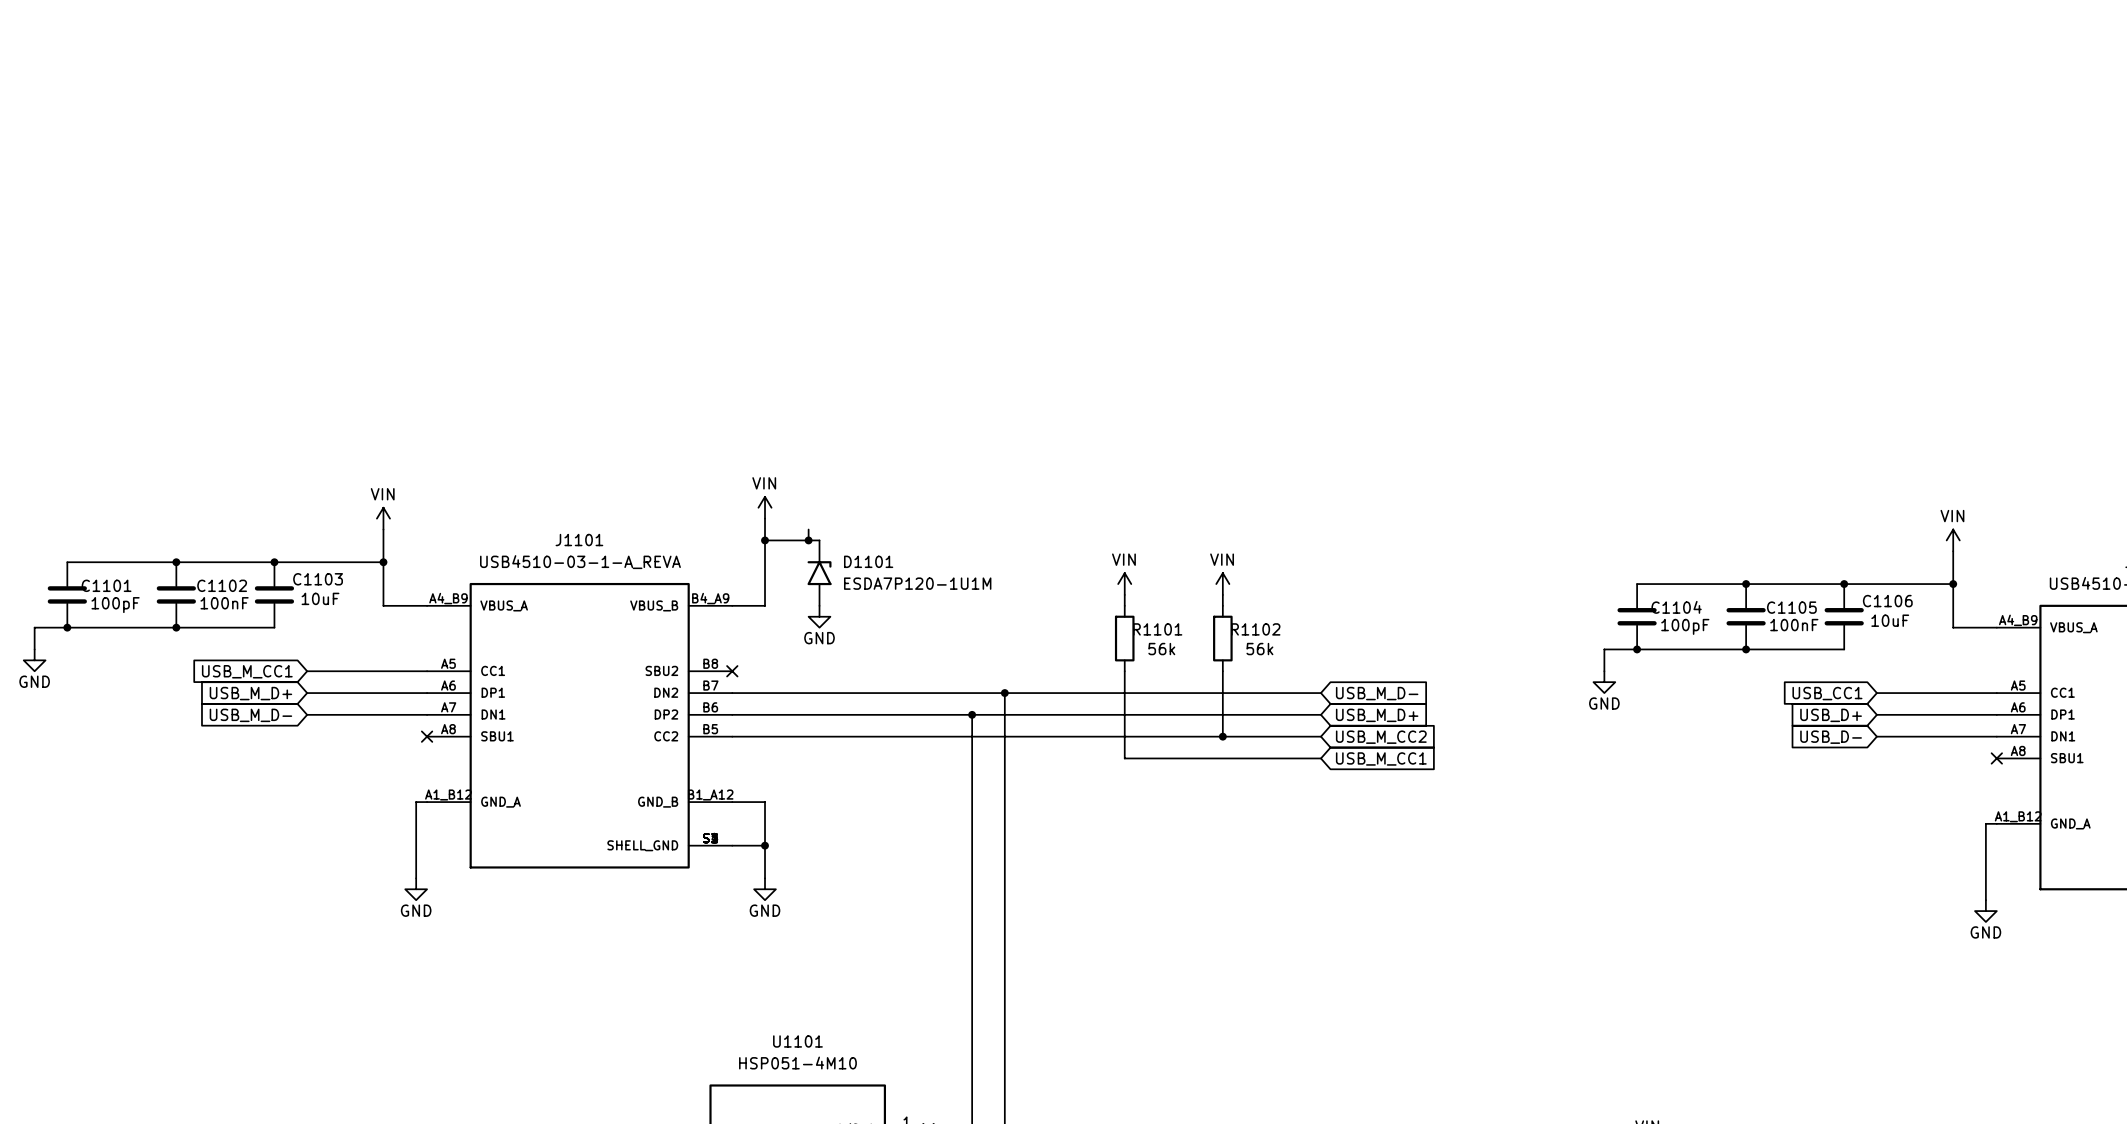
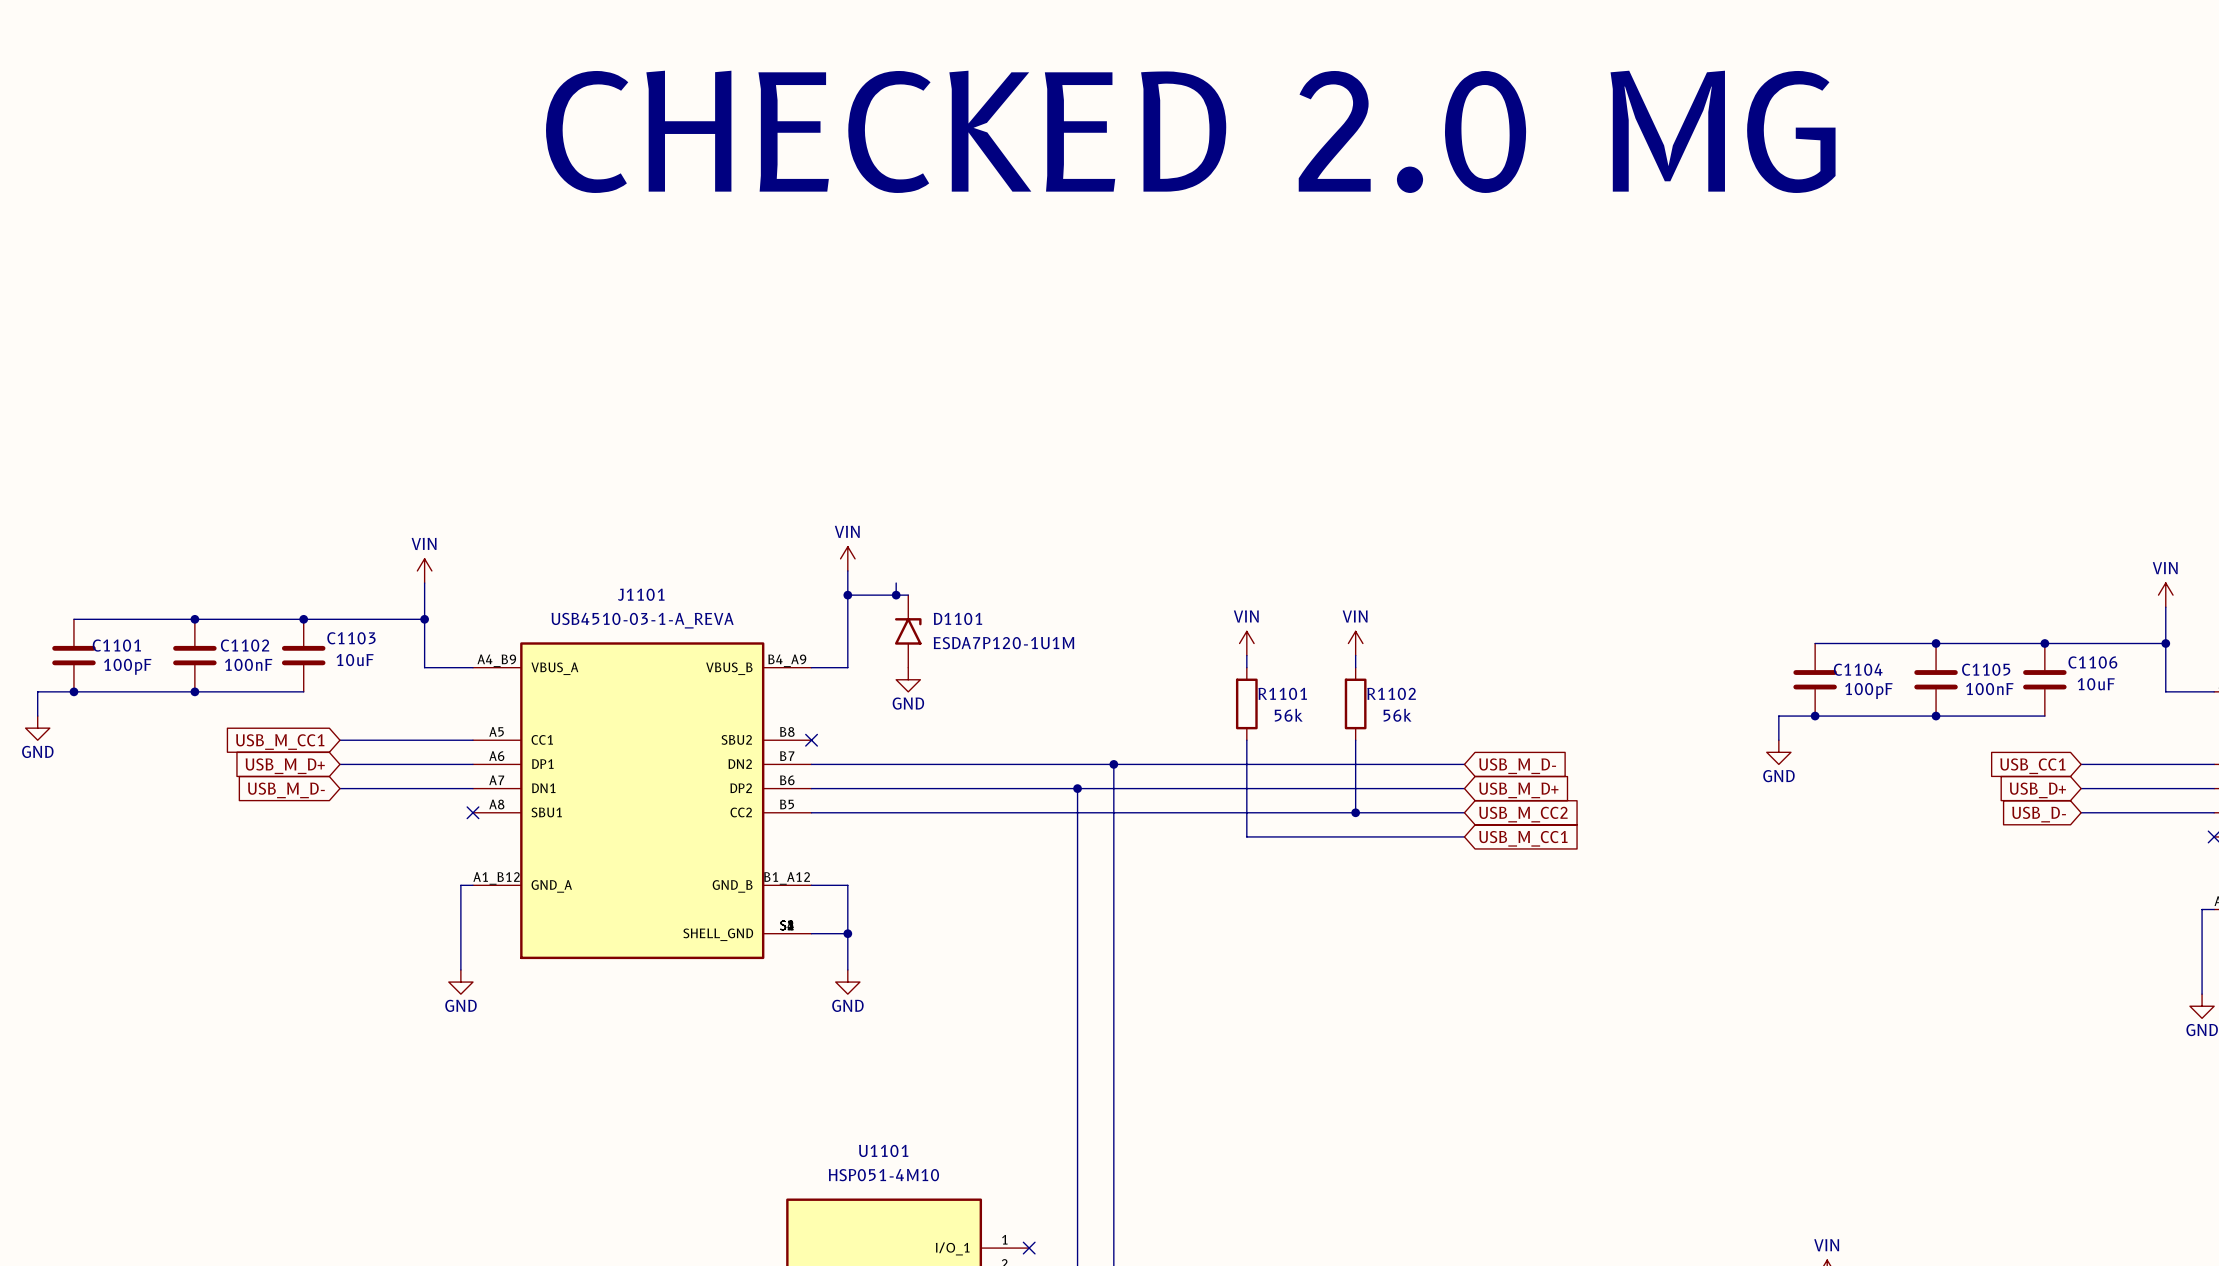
text: none -> CHECKED 2.0 MG (1190, 131)

